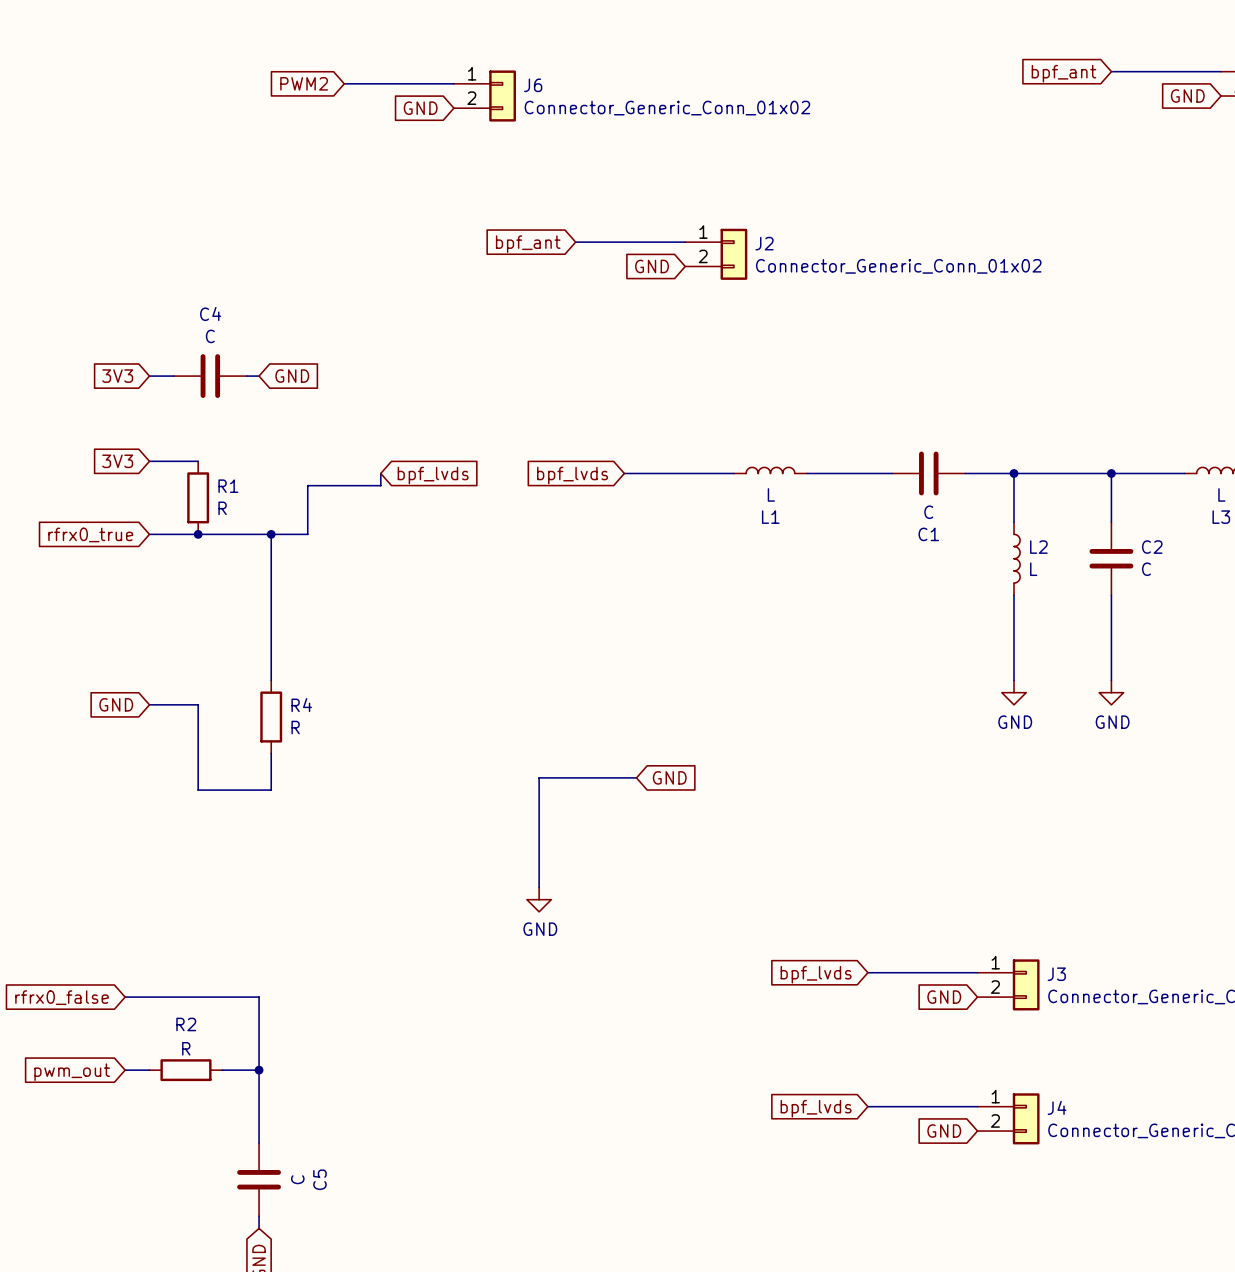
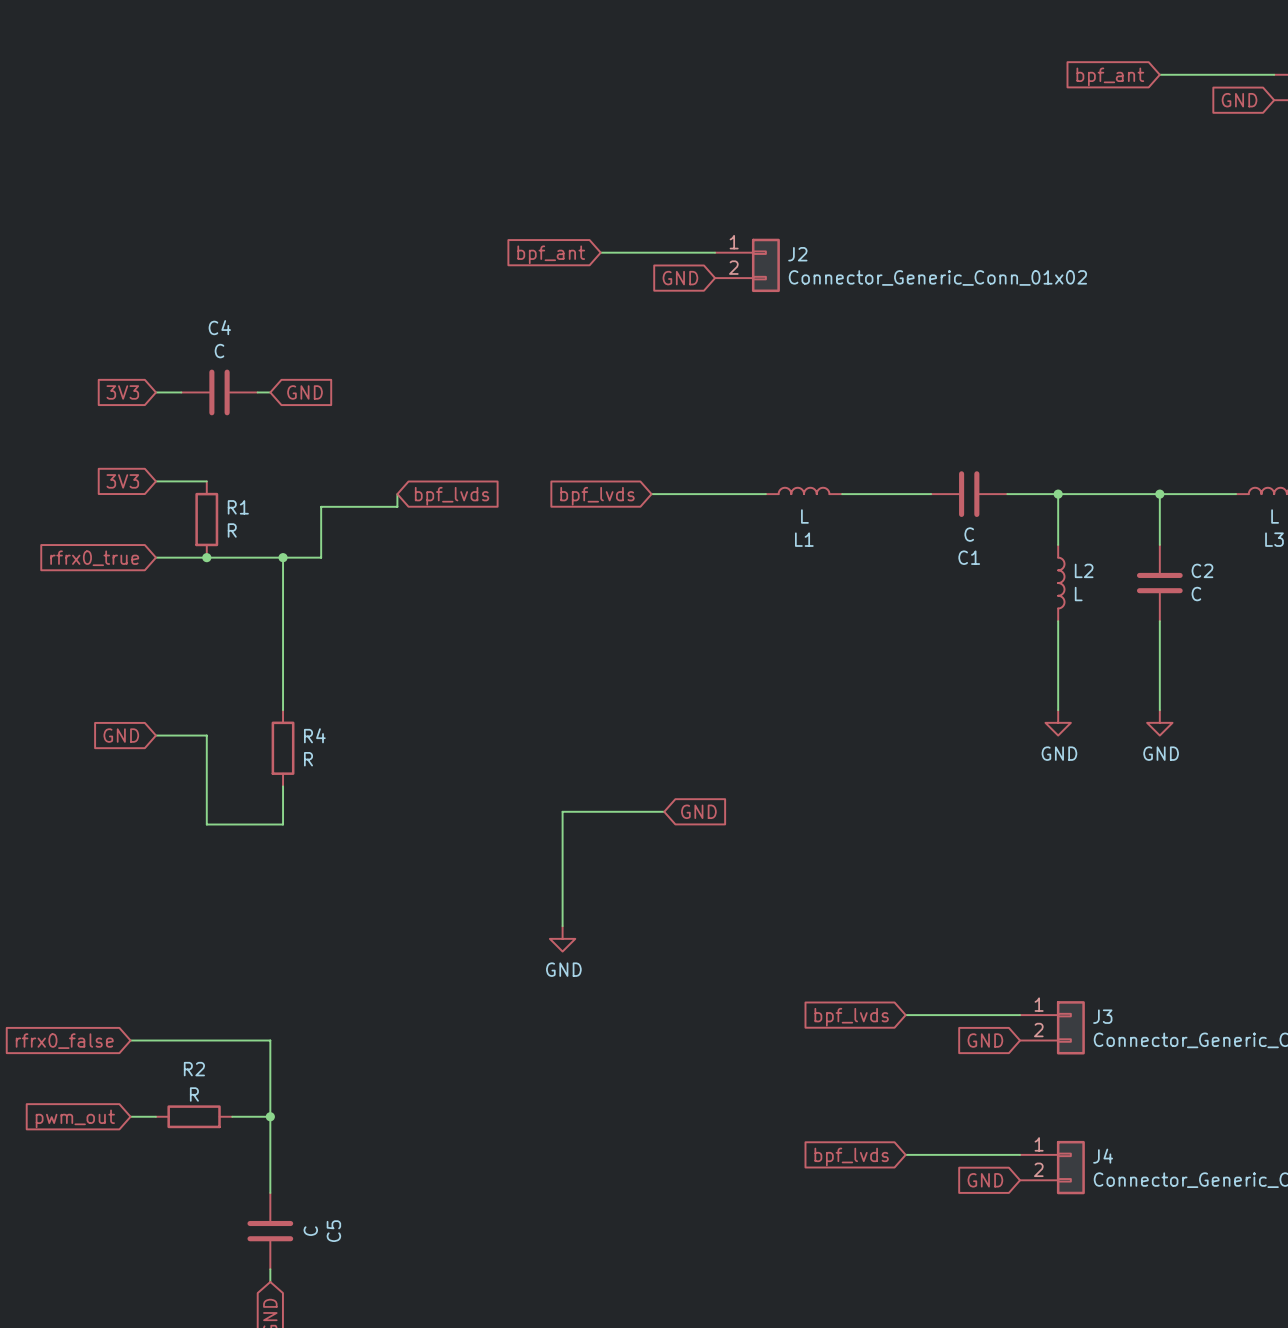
global label: PWM2 (304, 83) -> none
wire: (344, 83) (453, 83) -> none
J6: Connector_Generic_Conn_01x02 (484, 96) -> none
global label: GND (420, 108) -> none

